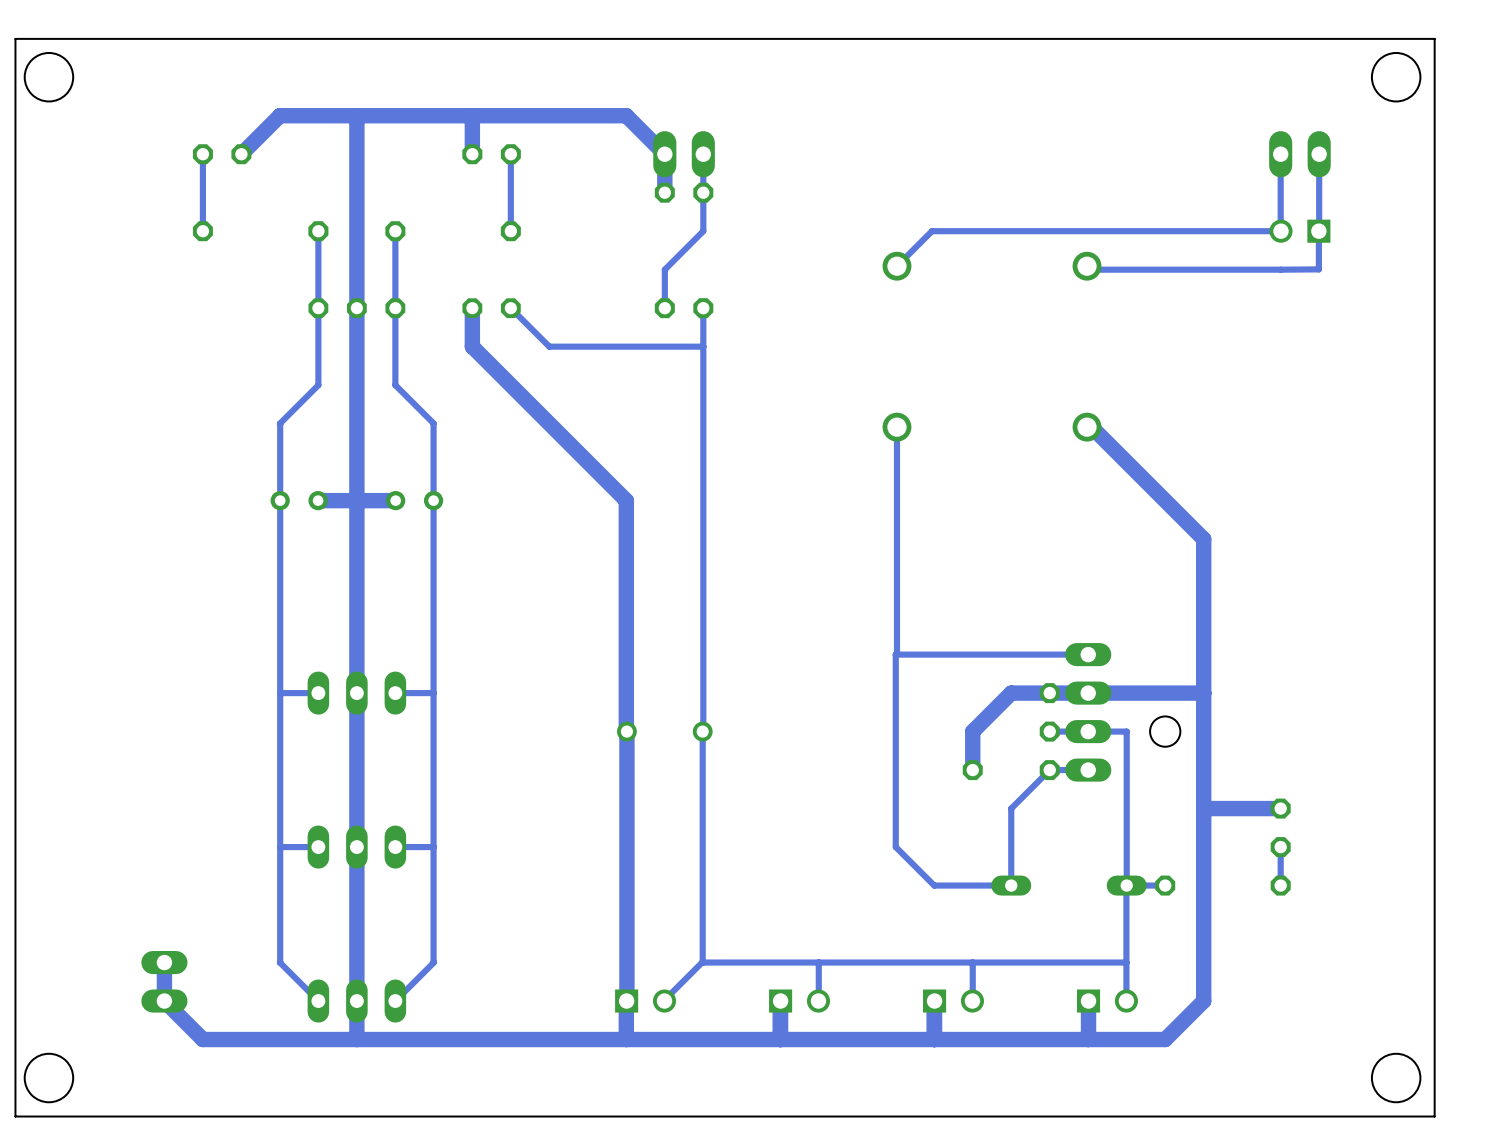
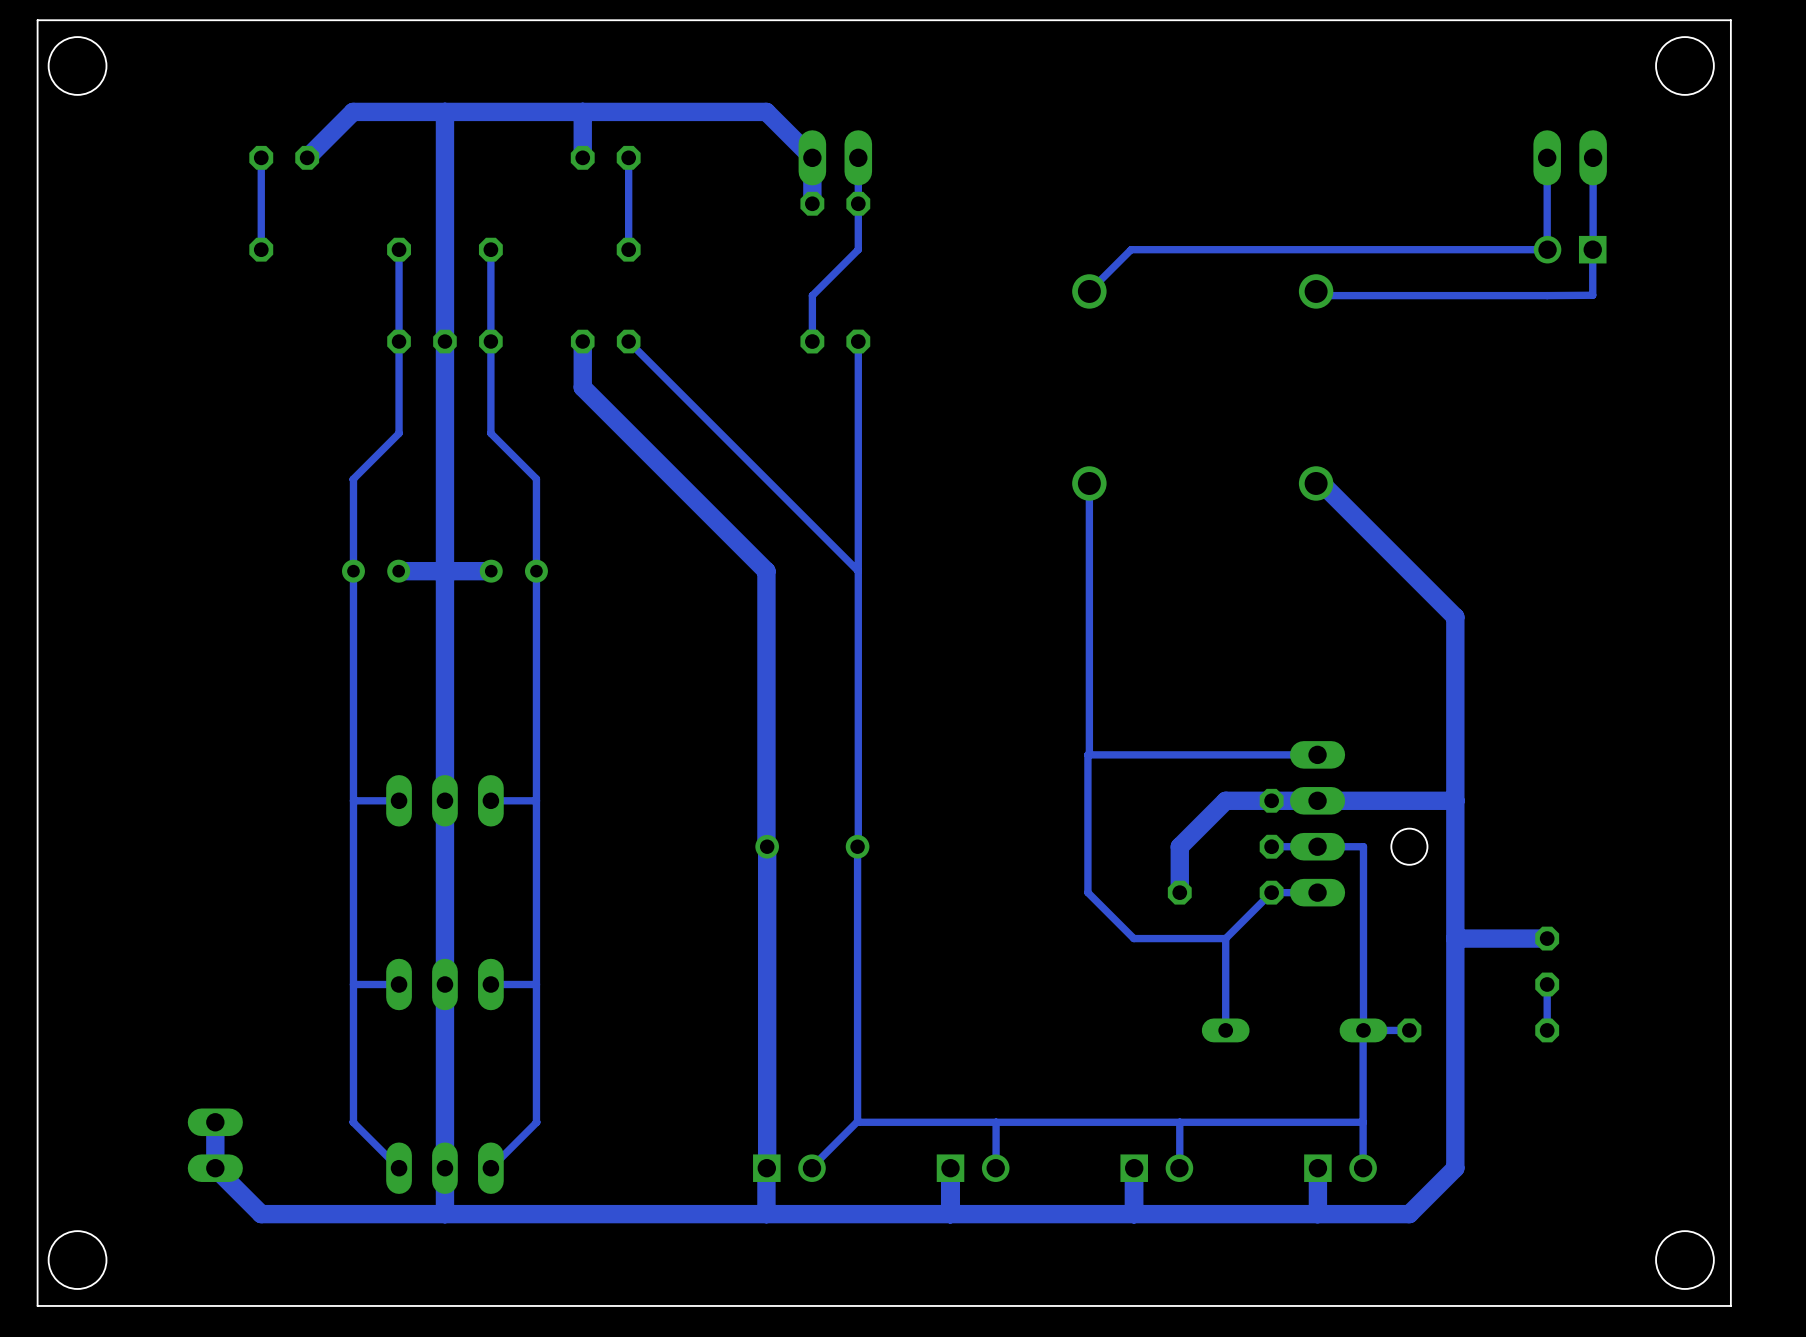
bottom track: (703, 346) (549, 346) -> (858, 571) (674, 387)
bottom track: (895, 770) (895, 847) (934, 885) (1011, 885) -> (1087, 892) (1133, 938) (1225, 938)

